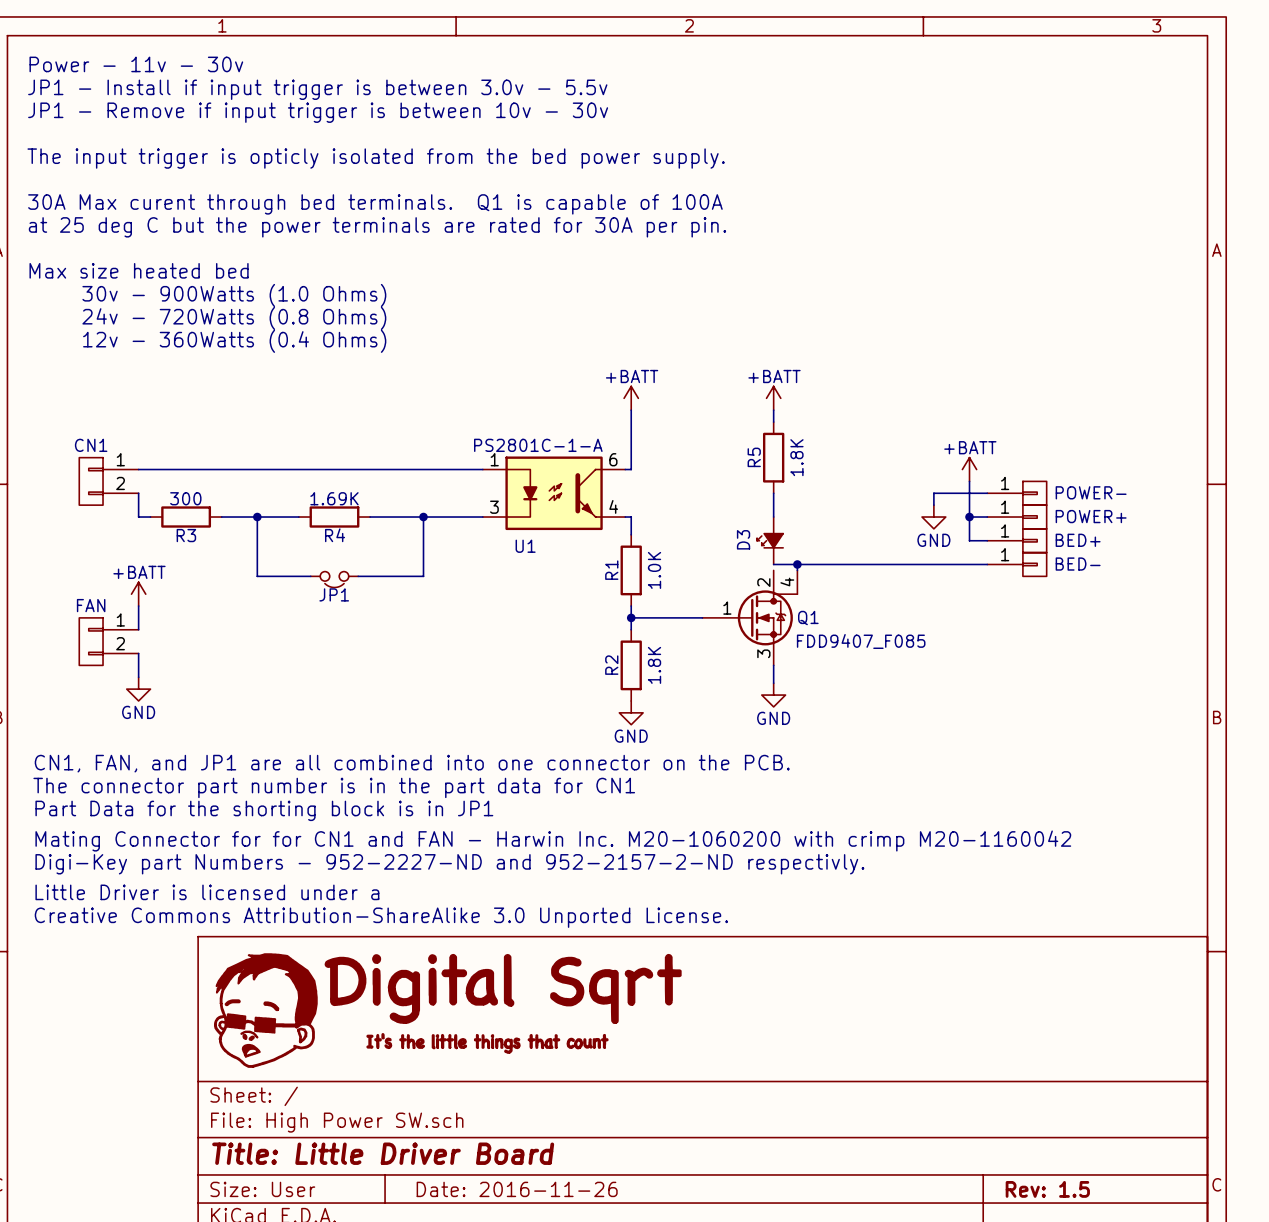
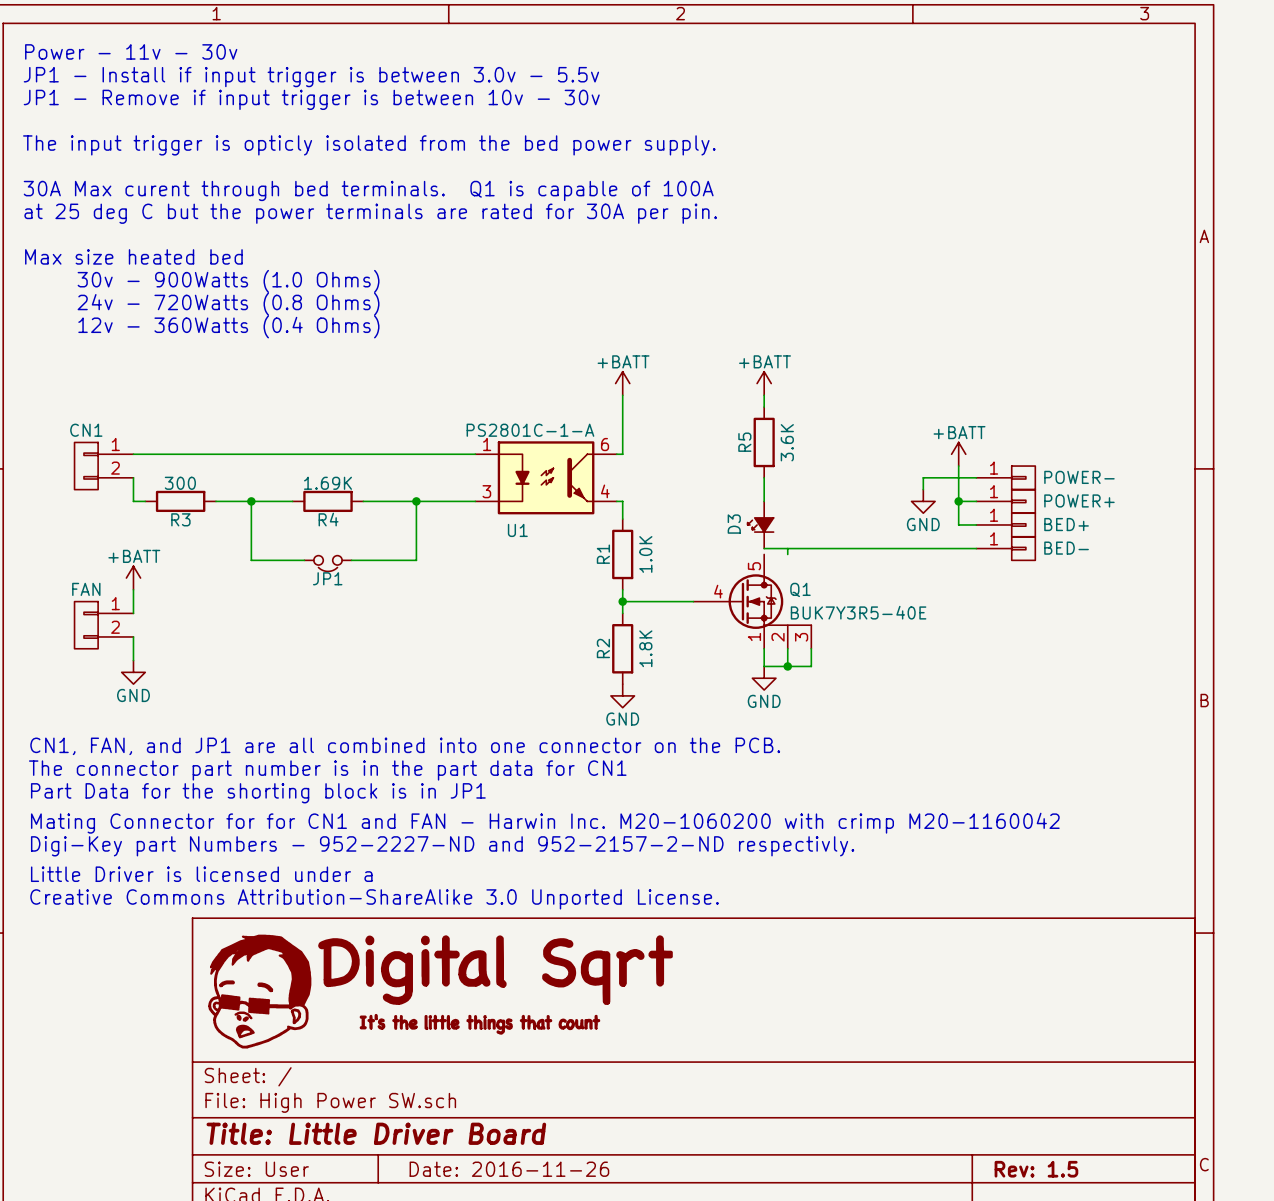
R5 value: 1.8K (796, 457) -> 3.6K (787, 442)
junction: (797, 564) -> none
Q1 symbol: [702, 570, 798, 666] -> [693, 554, 812, 649]
Q1 value: FDD9407_F085 (861, 641) -> BUK7Y3R5-40E (858, 612)
wire: none -> (787, 648) (787, 666)
wire: none -> (811, 648) (811, 666) (764, 666)
junction: none -> (787, 666)

